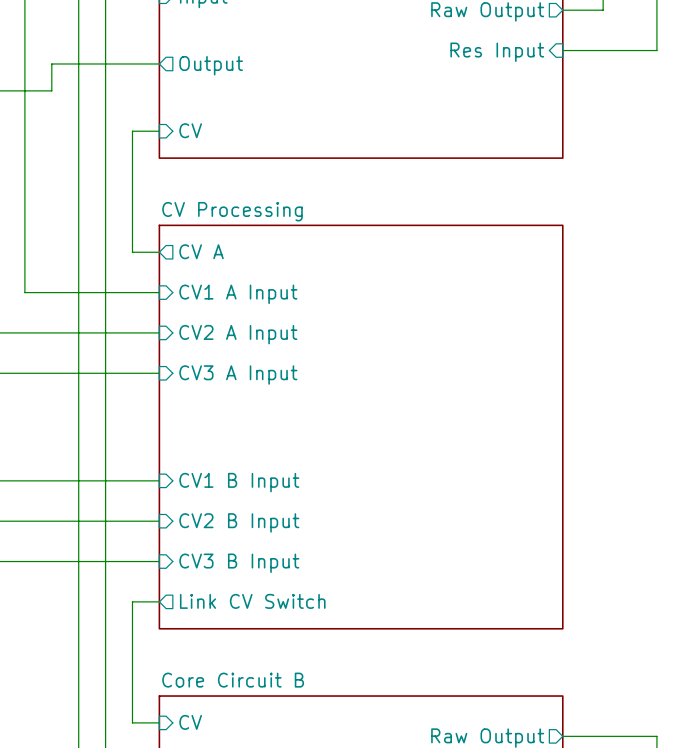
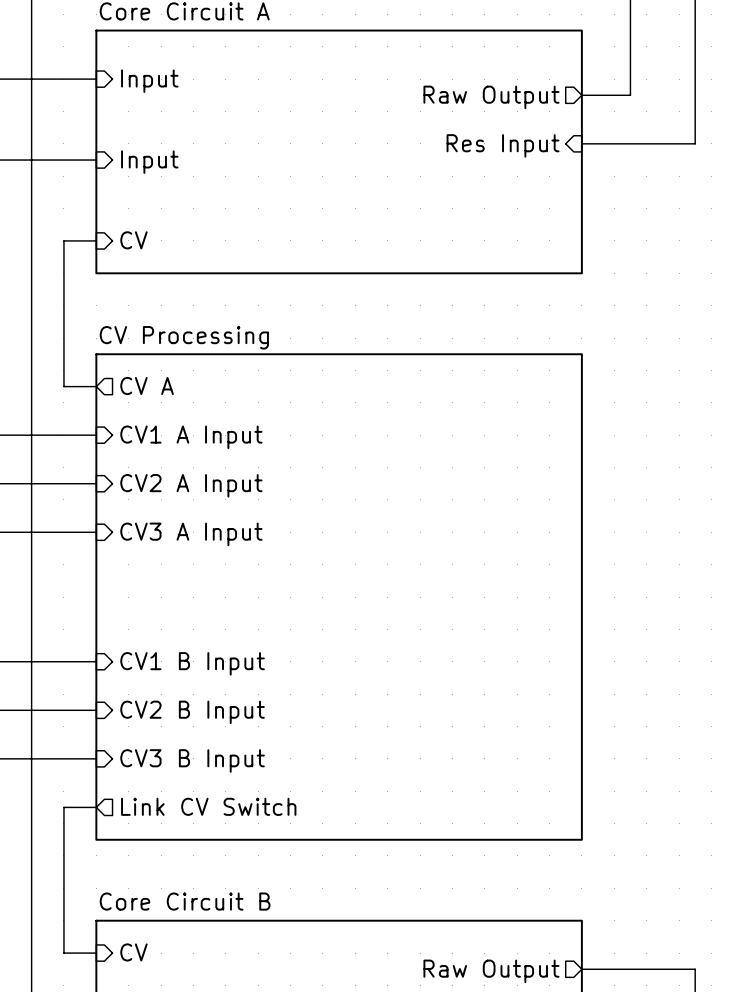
sheet pin shape: output (211, 65) -> input (149, 162)
sheet pin: Output (211, 65) -> Input (149, 162)

